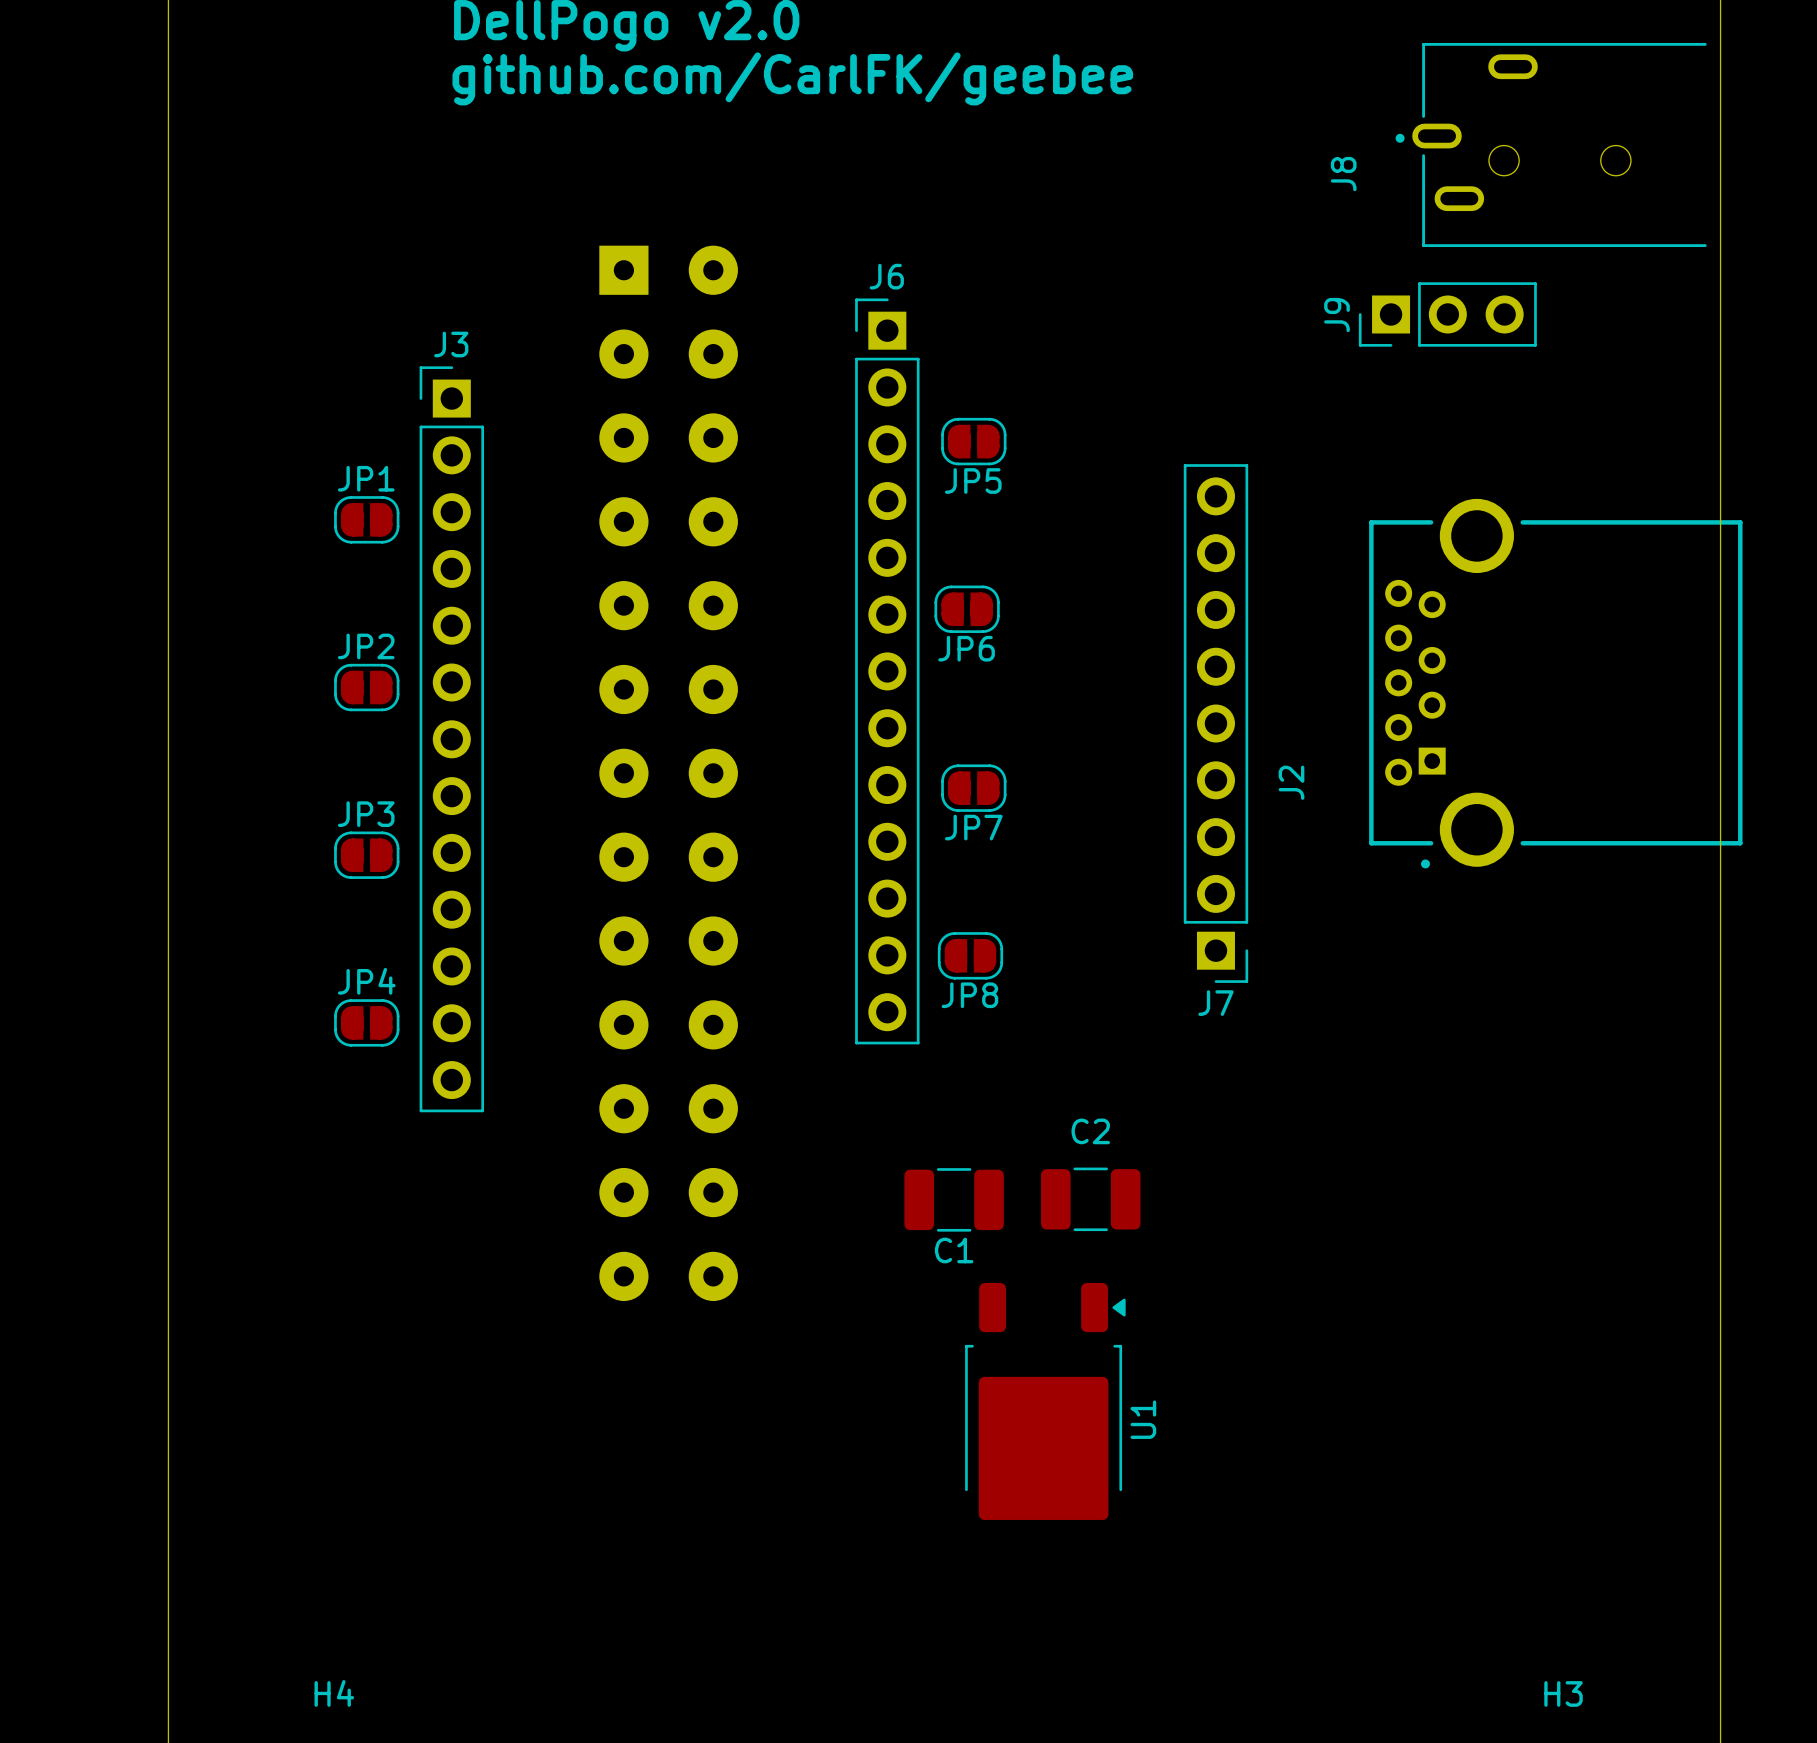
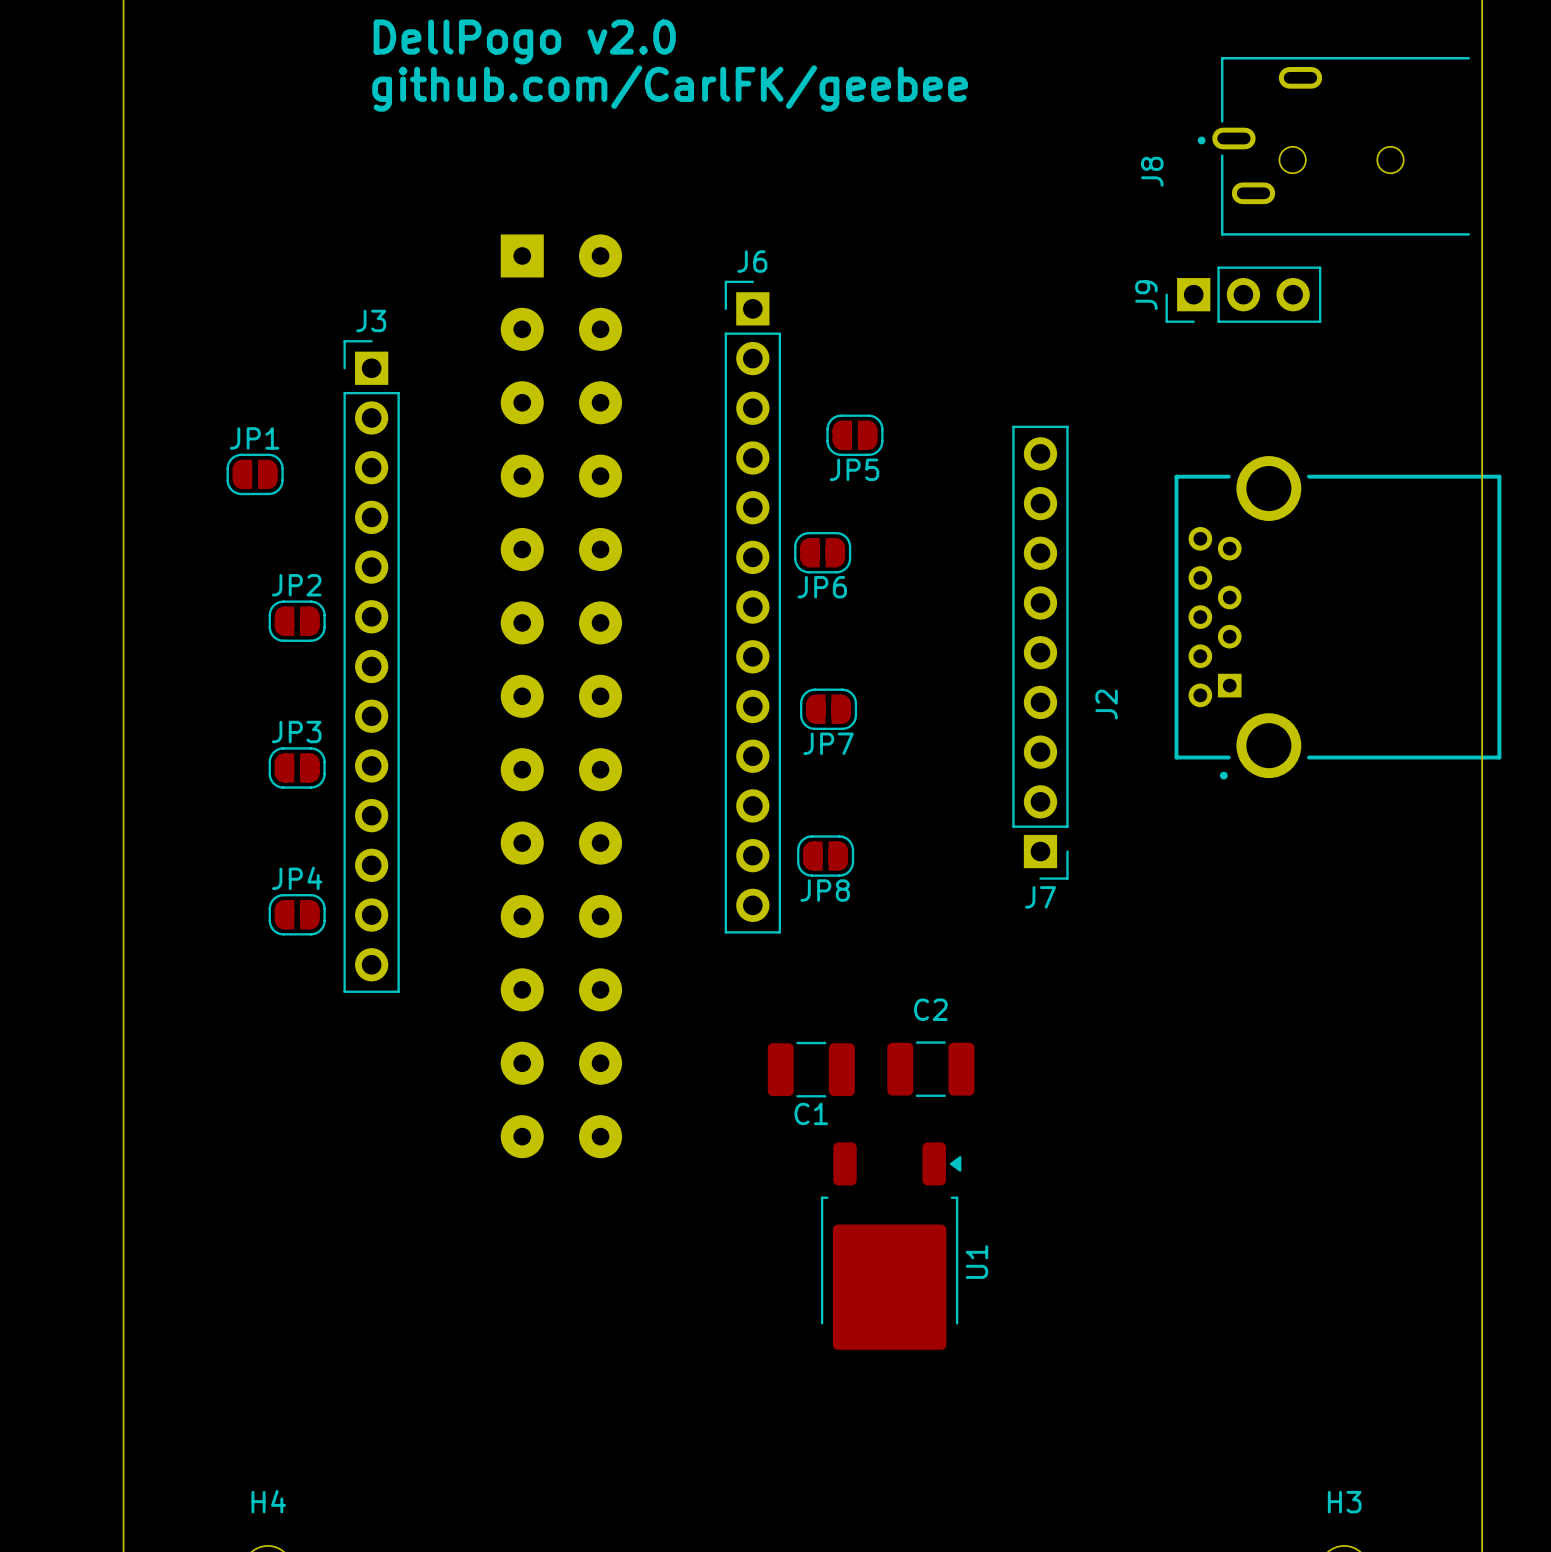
JP5 position: (973, 441) -> (854, 435)
JP1 position: (366, 519) -> (255, 474)

